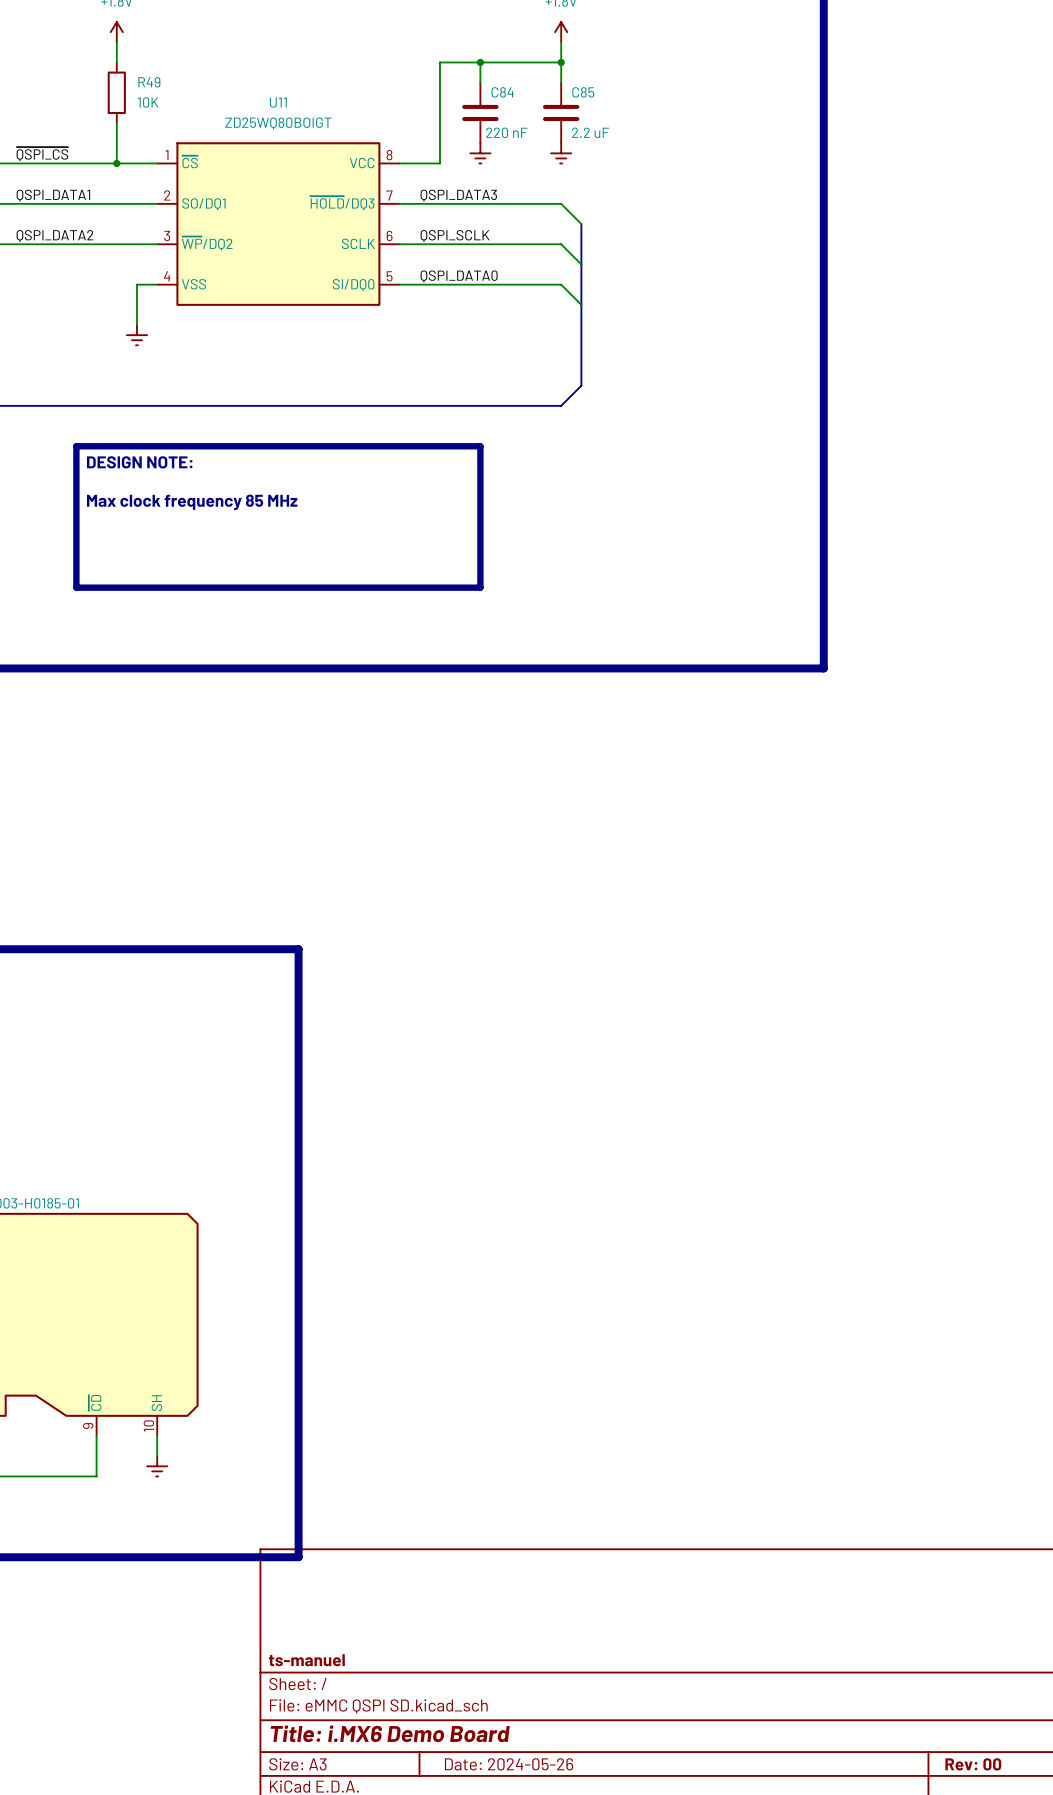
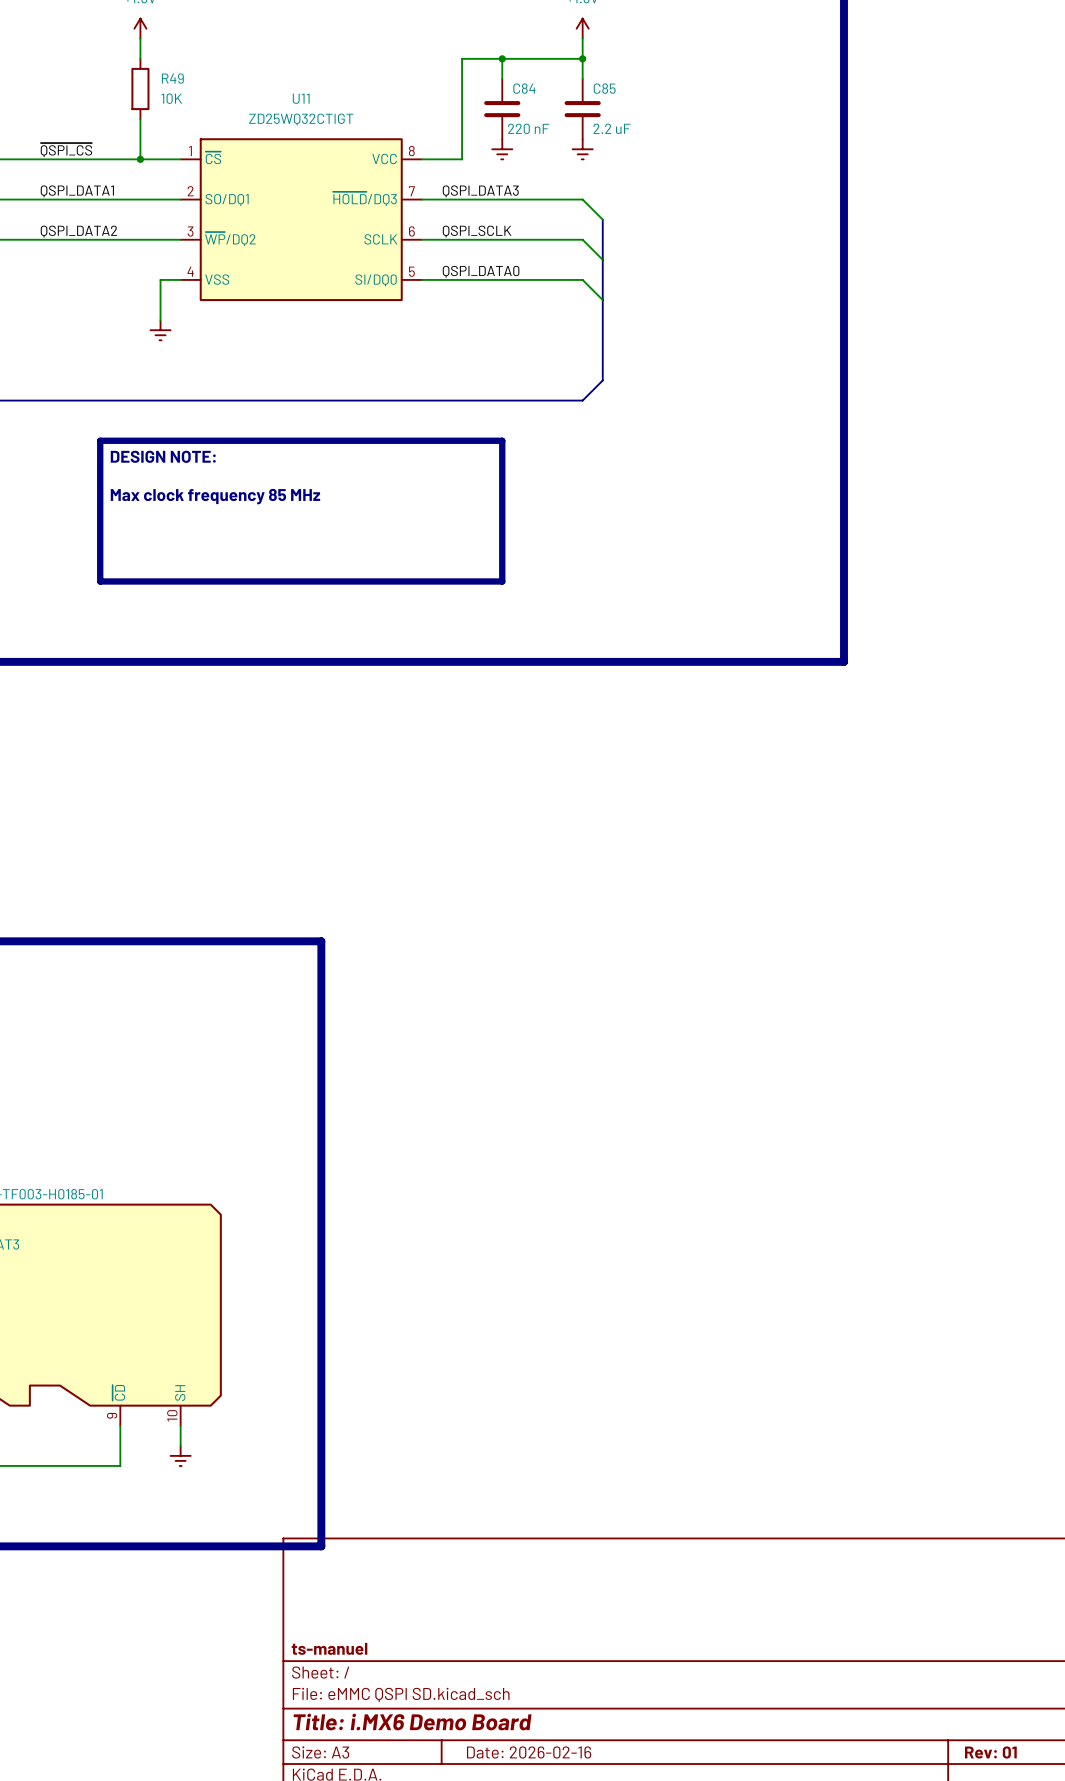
U11 value: ZD25WQ80BOIGT (278, 123) -> ZD25WQ32CTIGT (301, 119)
title block: Date: 2024-05-26 (509, 1764) -> Date: 2026-02-16 (529, 1752)
title block: Rev: 00 (973, 1764) -> Rev: 01 (990, 1752)

